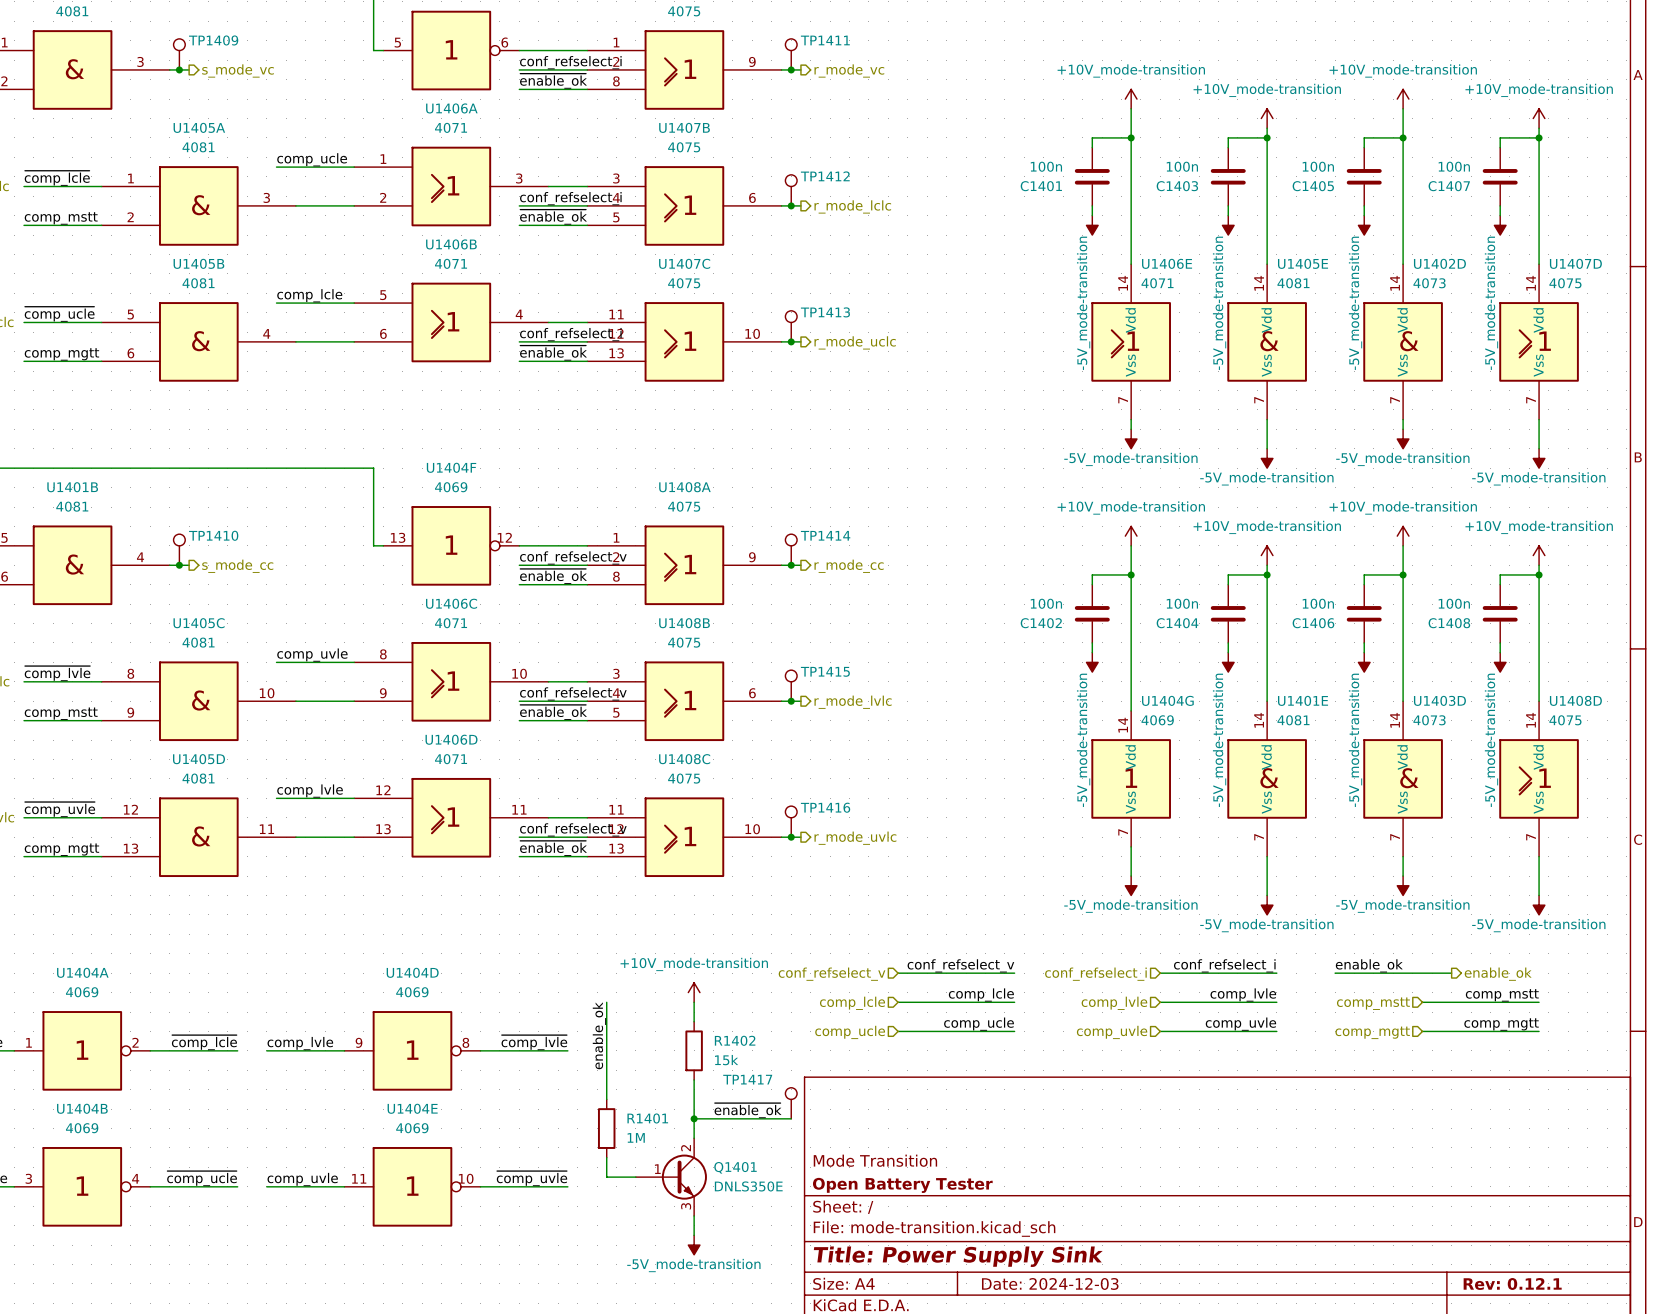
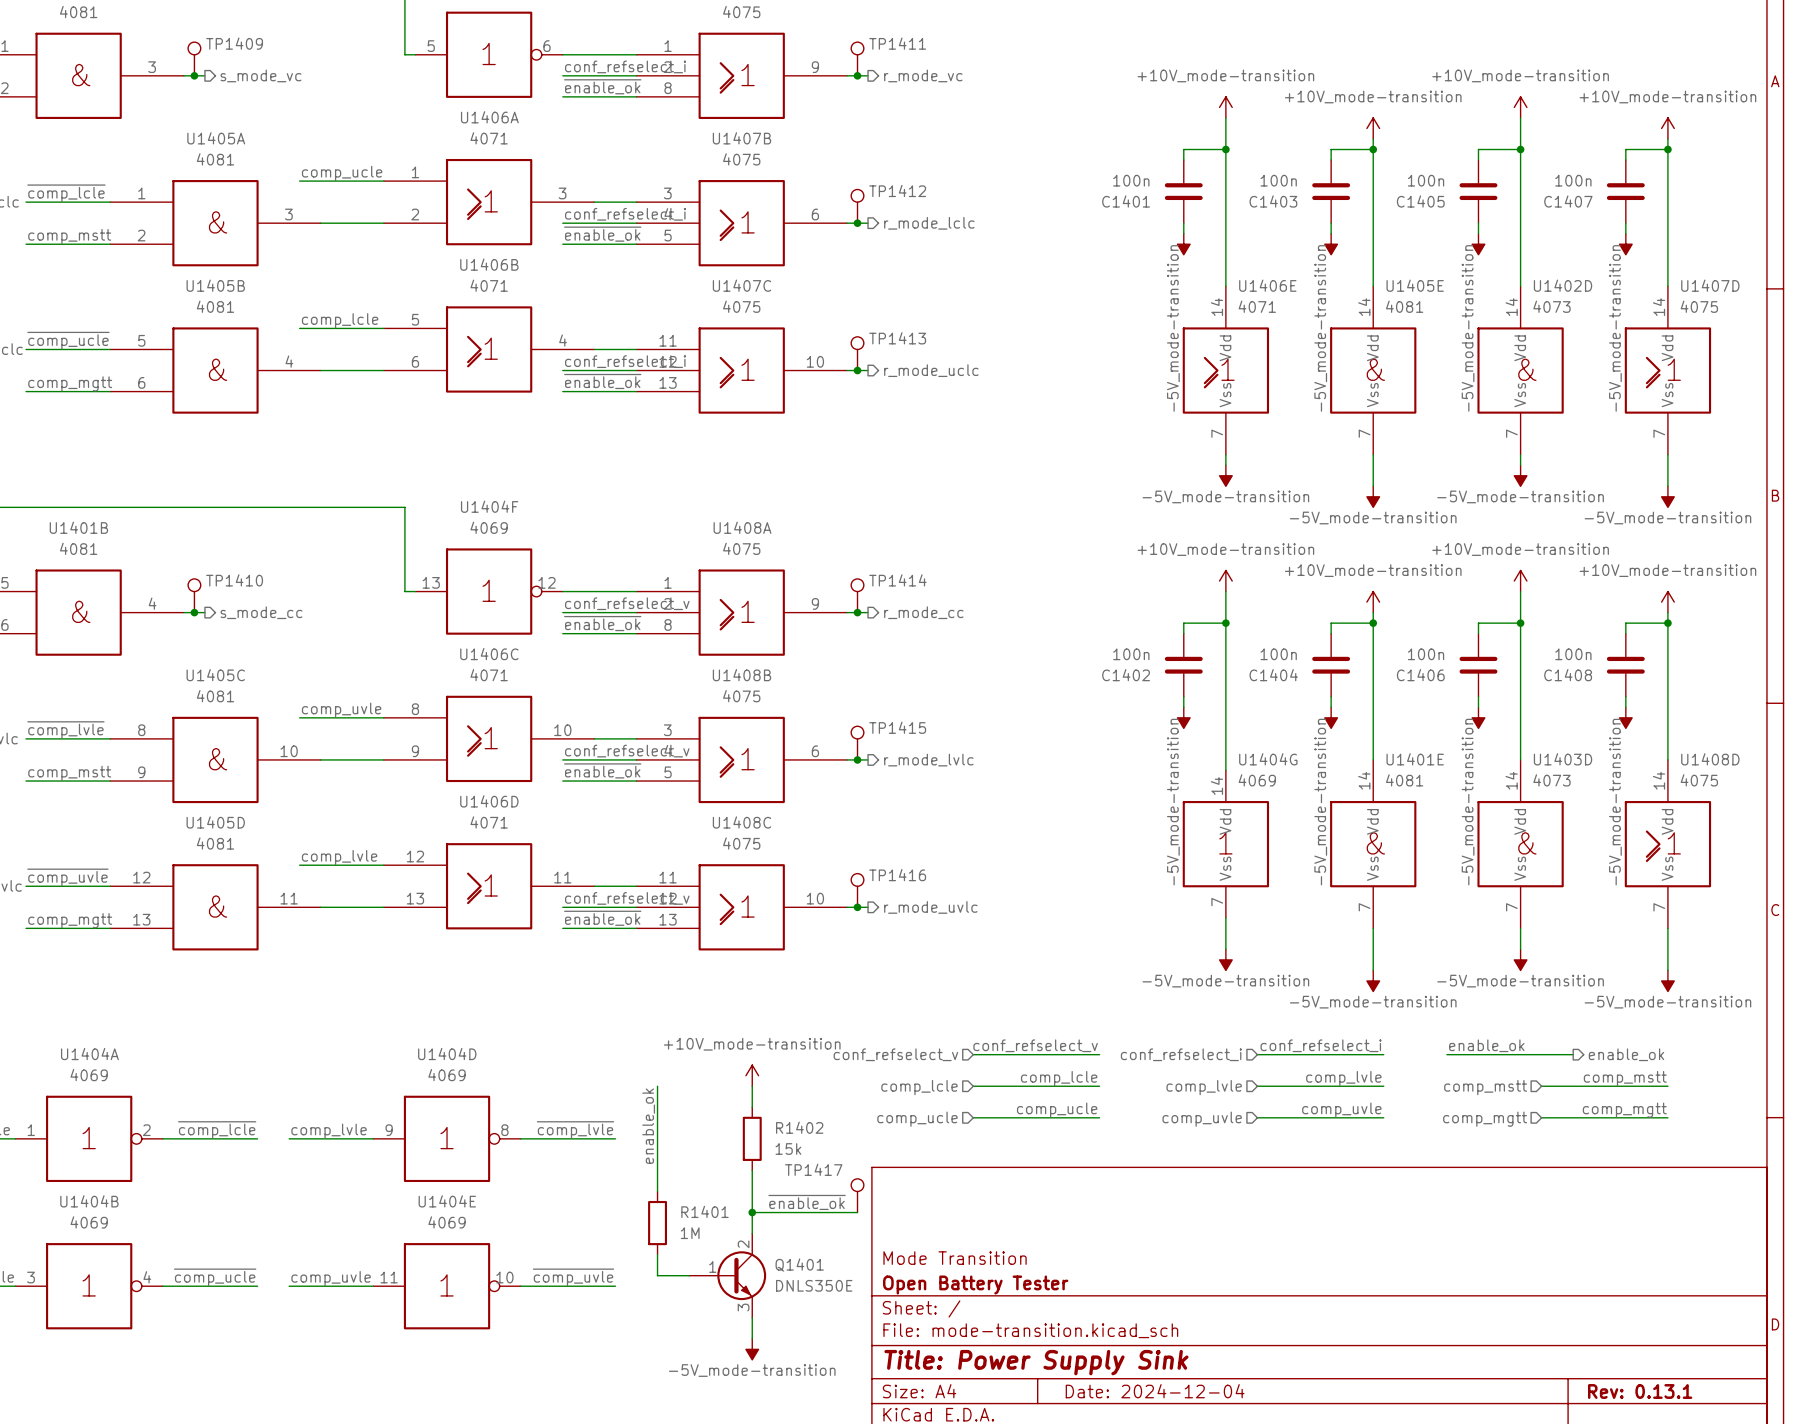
title block: Date: 2024-12-03 (1050, 1283) -> Date: 2024-12-04 (1155, 1391)
title block: Rev: 0.12.1 (1512, 1283) -> Rev: 0.13.1 (1640, 1391)

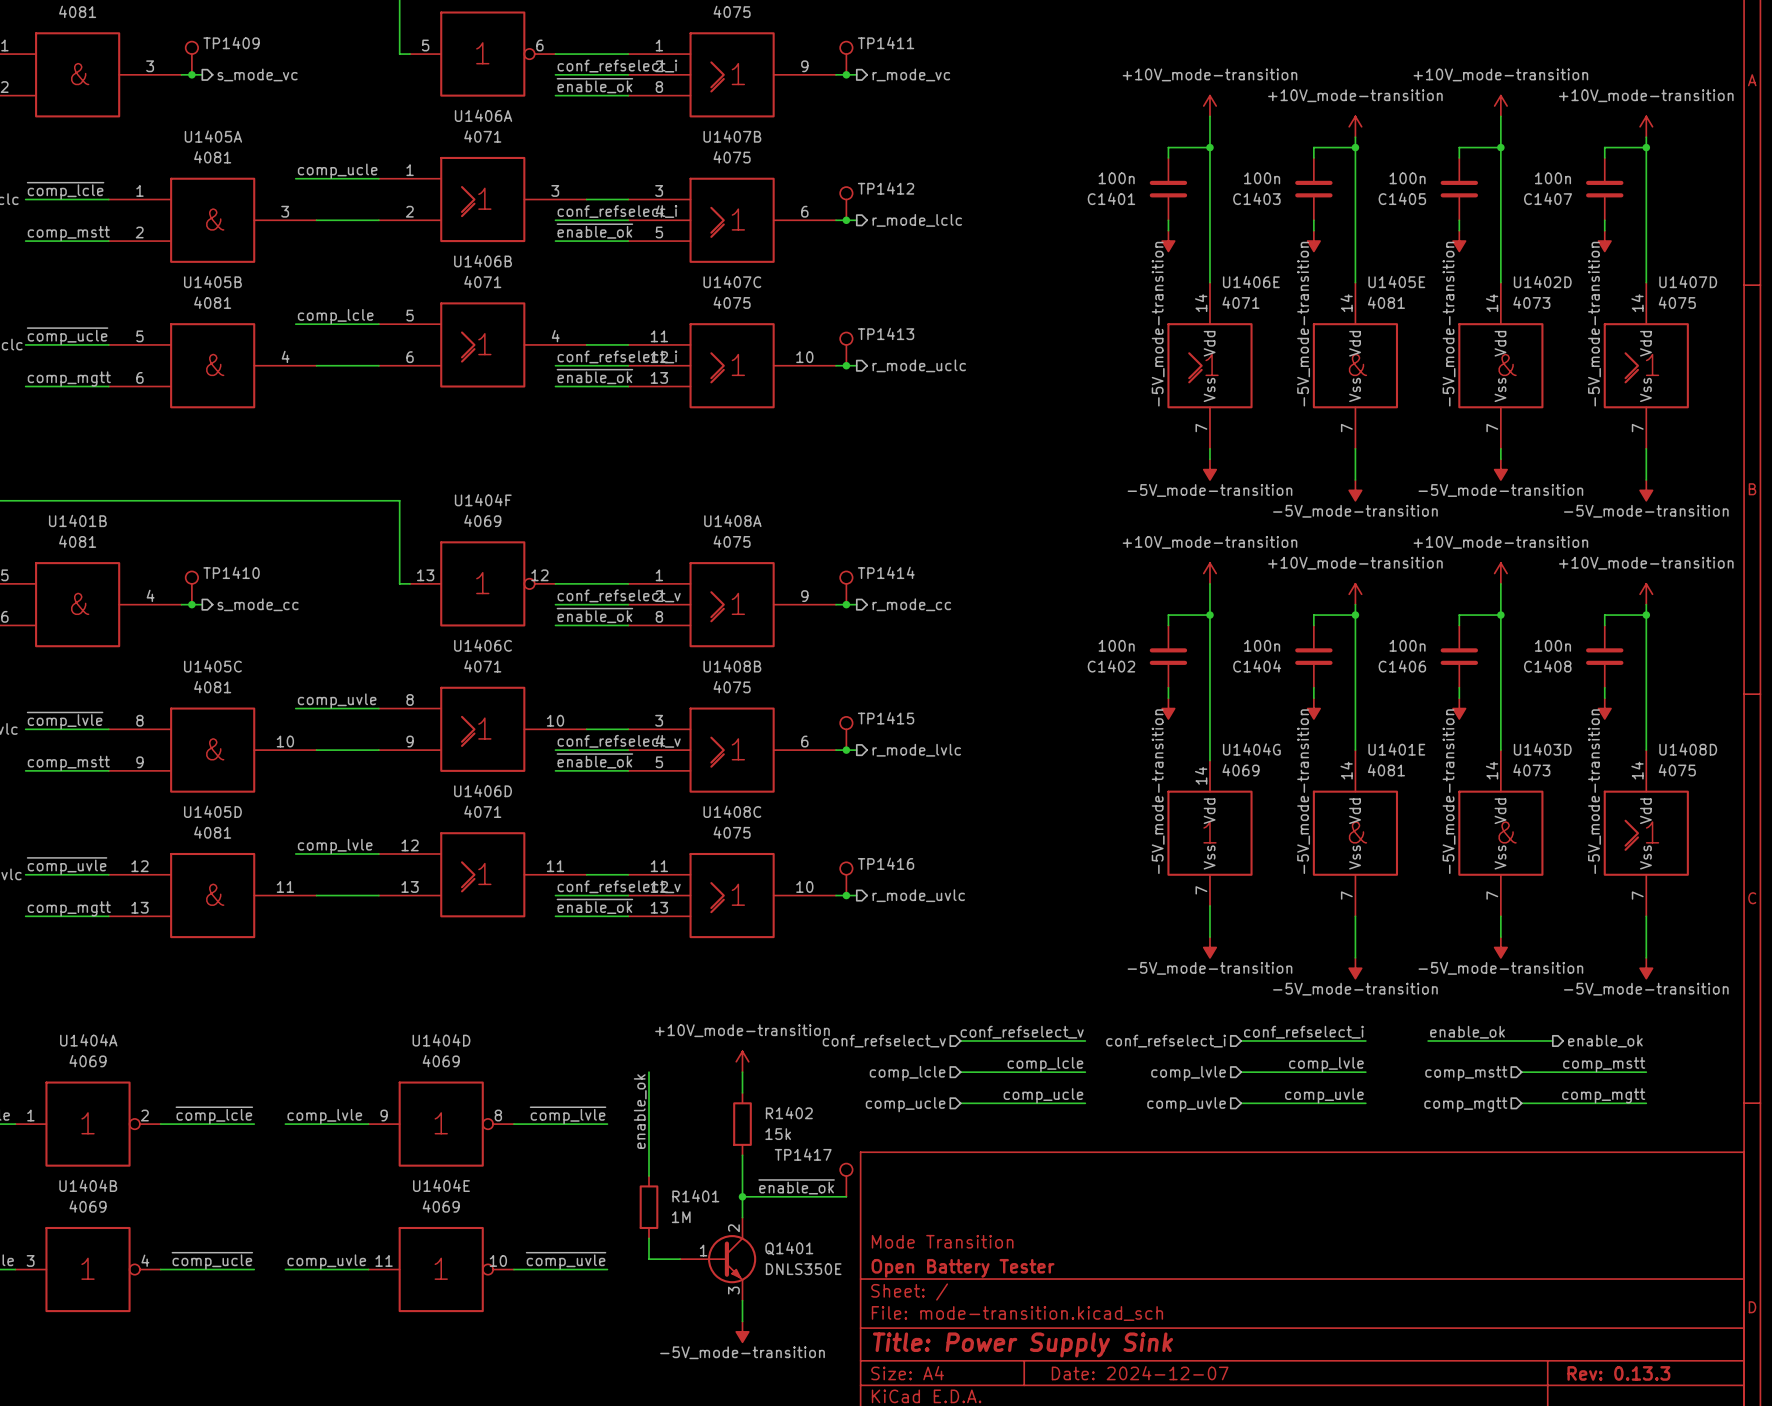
title block: Date: 2024-12-04 (1155, 1391) -> Date: 2024-12-07 (1140, 1373)
title block: Rev: 0.13.1 (1640, 1391) -> Rev: 0.13.3 (1618, 1373)

